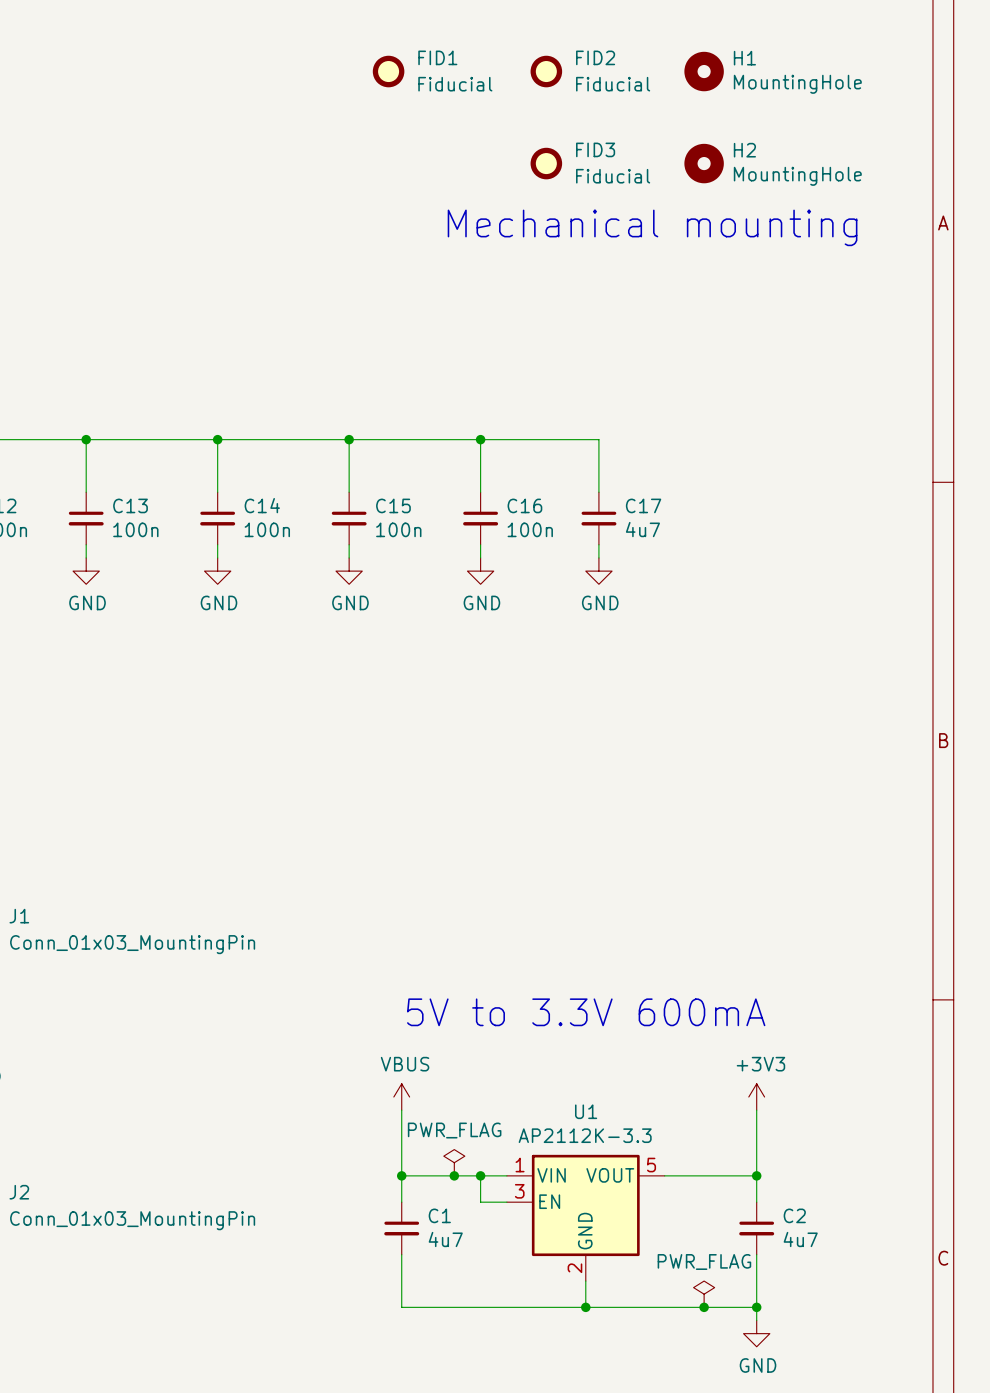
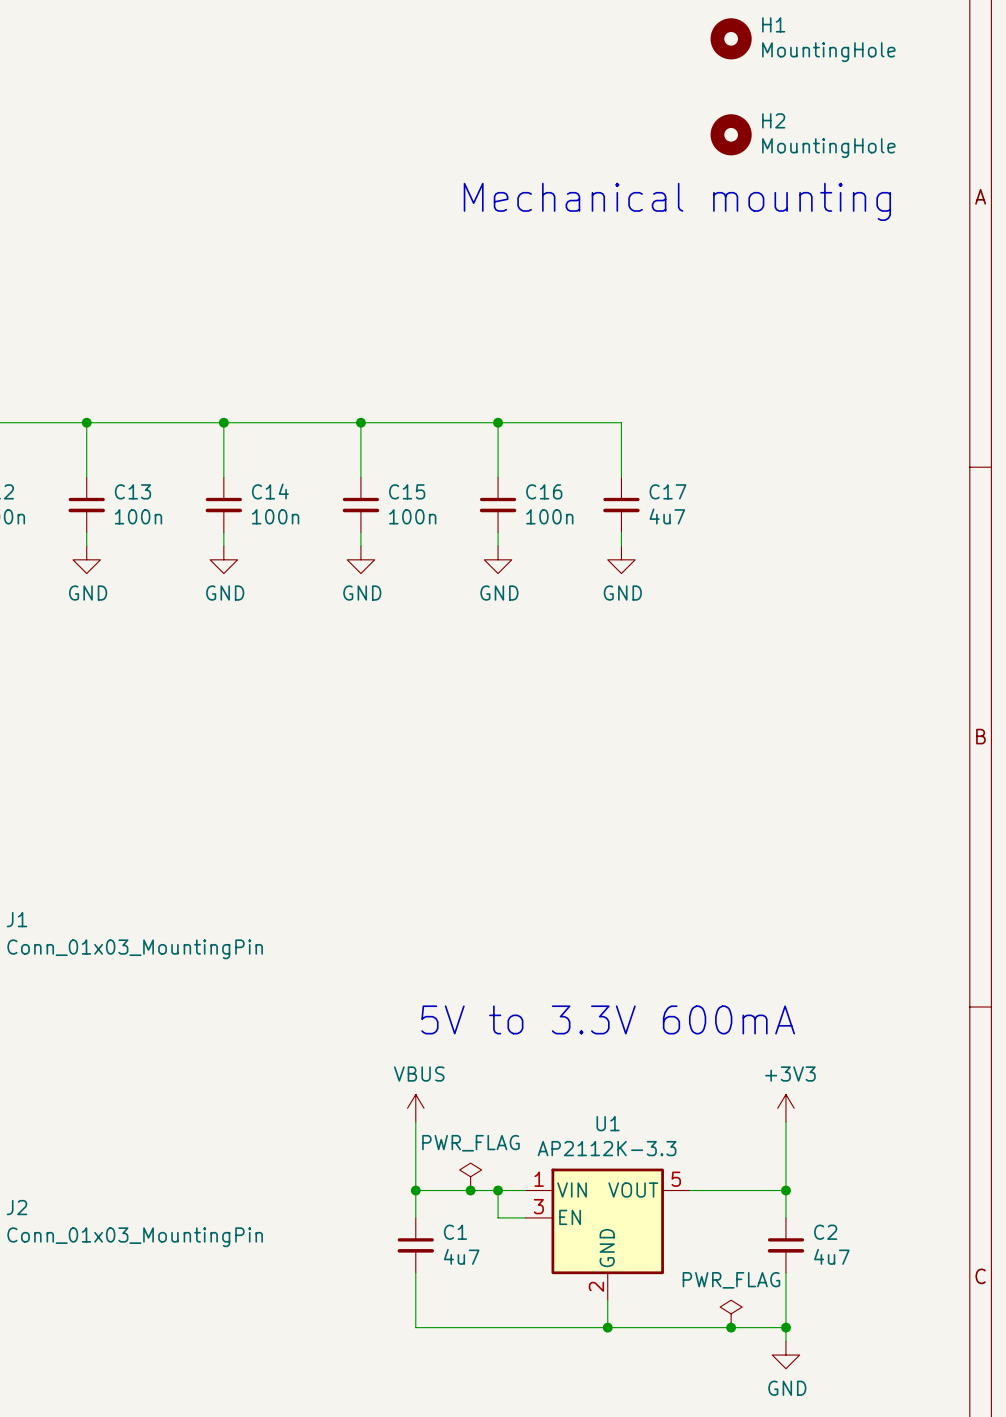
FID1: Fiducial (388, 71) -> none
FID2: Fiducial (546, 71) -> none
FID3: Fiducial (546, 163) -> none

